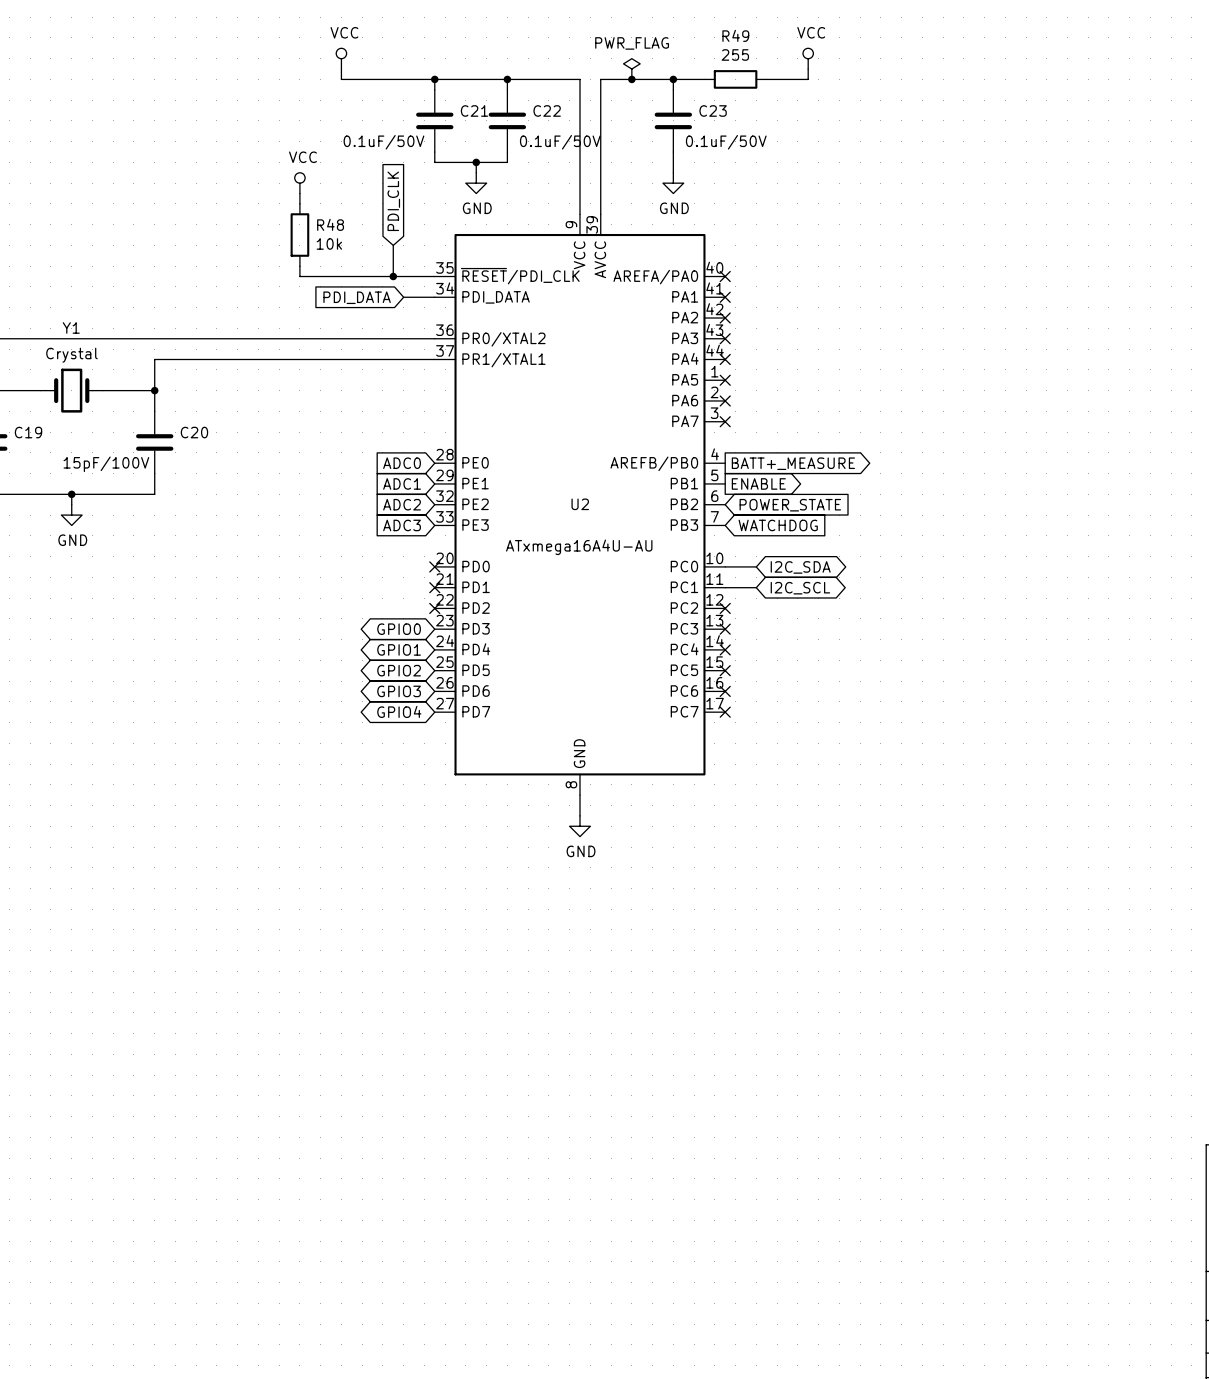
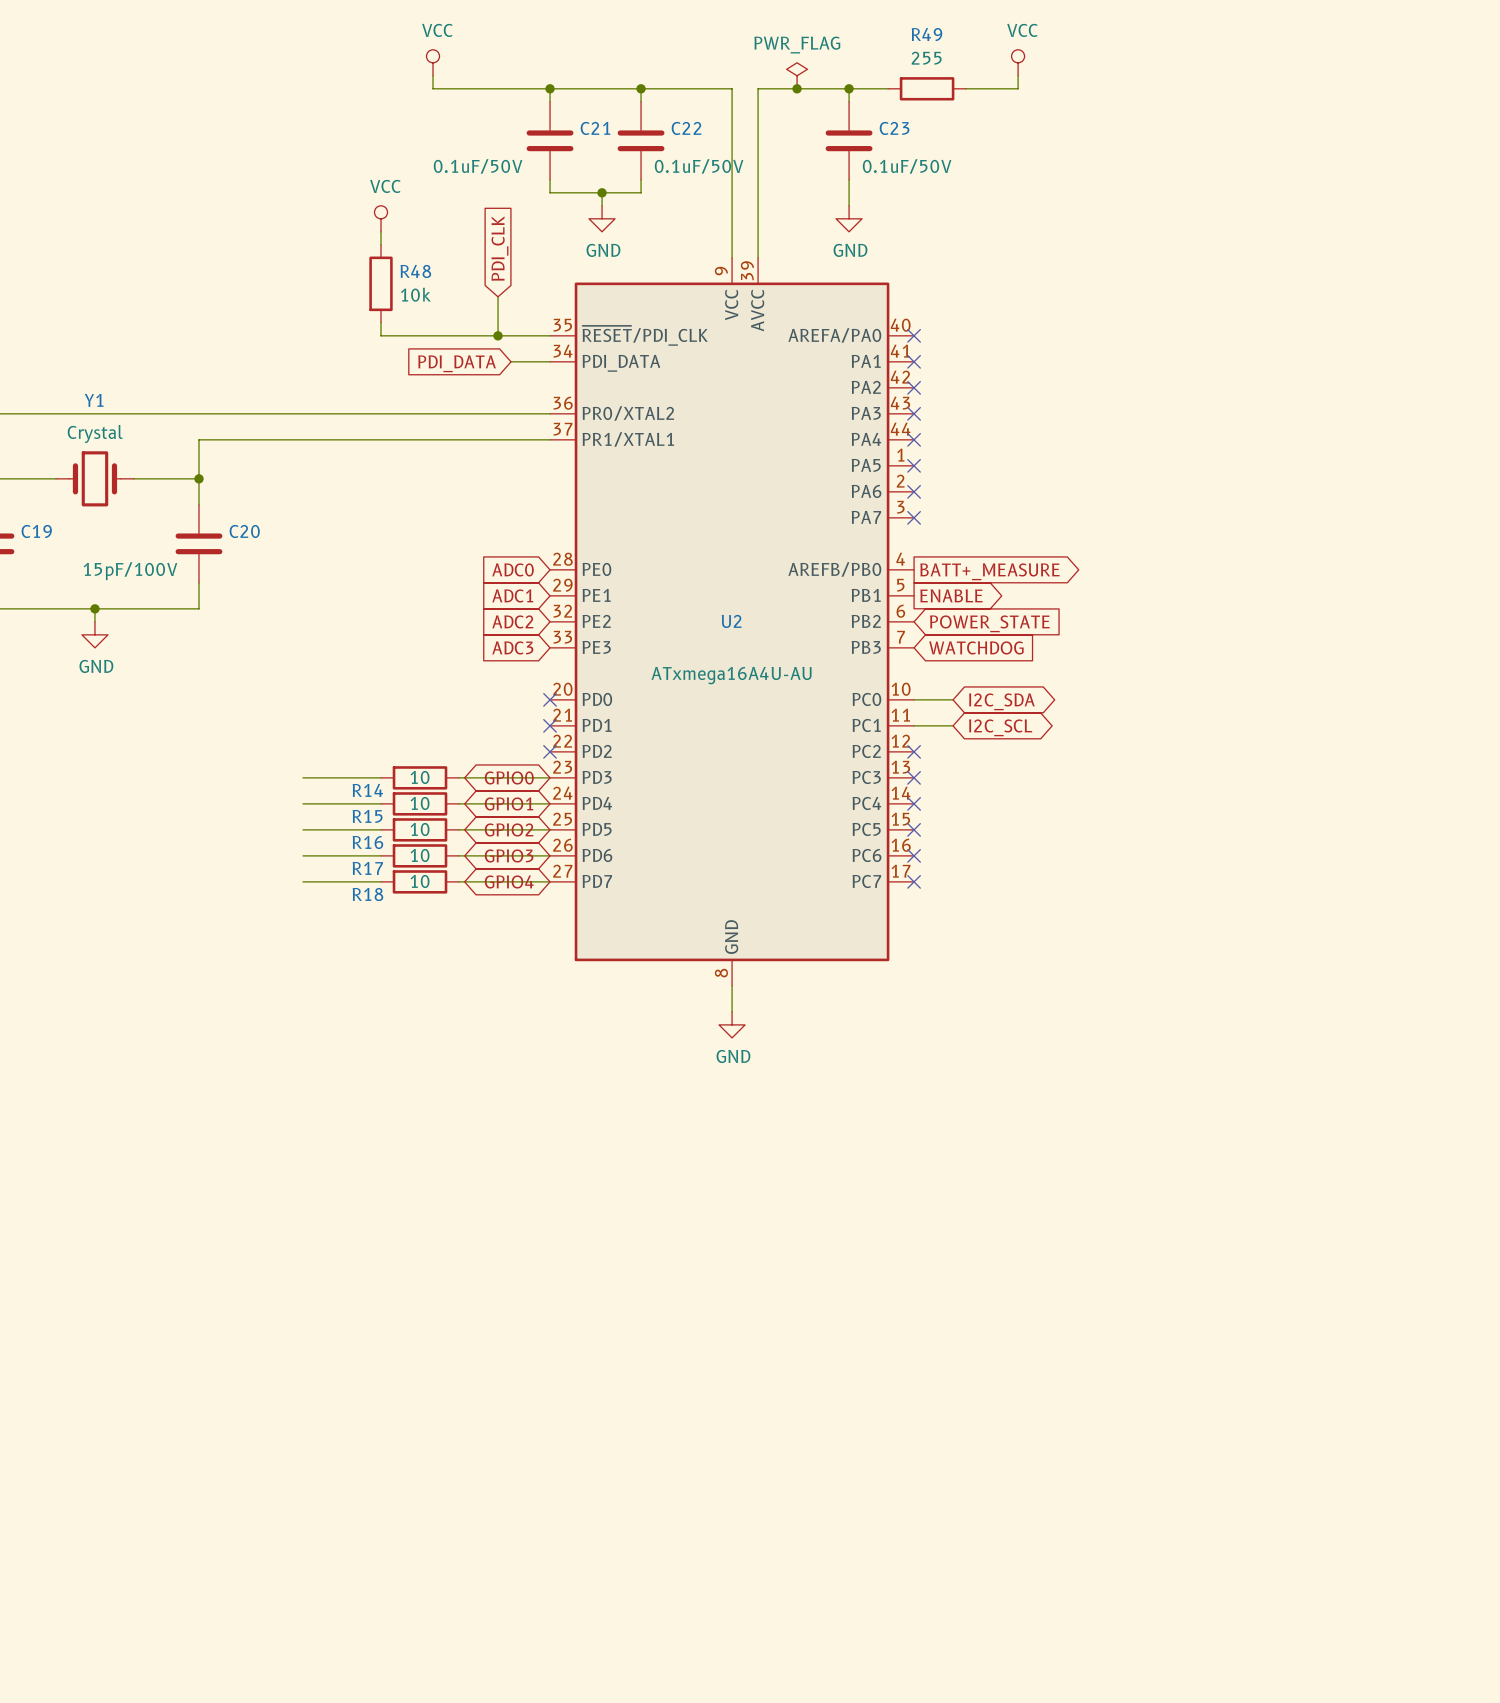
wire: none -> (303, 777) (381, 777)
R14: none -> 10 (420, 777)
wire: none -> (459, 777) (550, 777)
wire: none -> (303, 803) (381, 803)
R15: none -> 10 (420, 803)
wire: none -> (459, 803) (550, 803)
wire: none -> (303, 829) (381, 829)
R16: none -> 10 (420, 829)
wire: none -> (459, 829) (550, 829)
wire: none -> (303, 855) (381, 855)
R17: none -> 10 (420, 855)
wire: none -> (459, 855) (550, 855)
wire: none -> (303, 881) (381, 881)
R18: none -> 10 (420, 881)
wire: none -> (459, 881) (550, 881)

